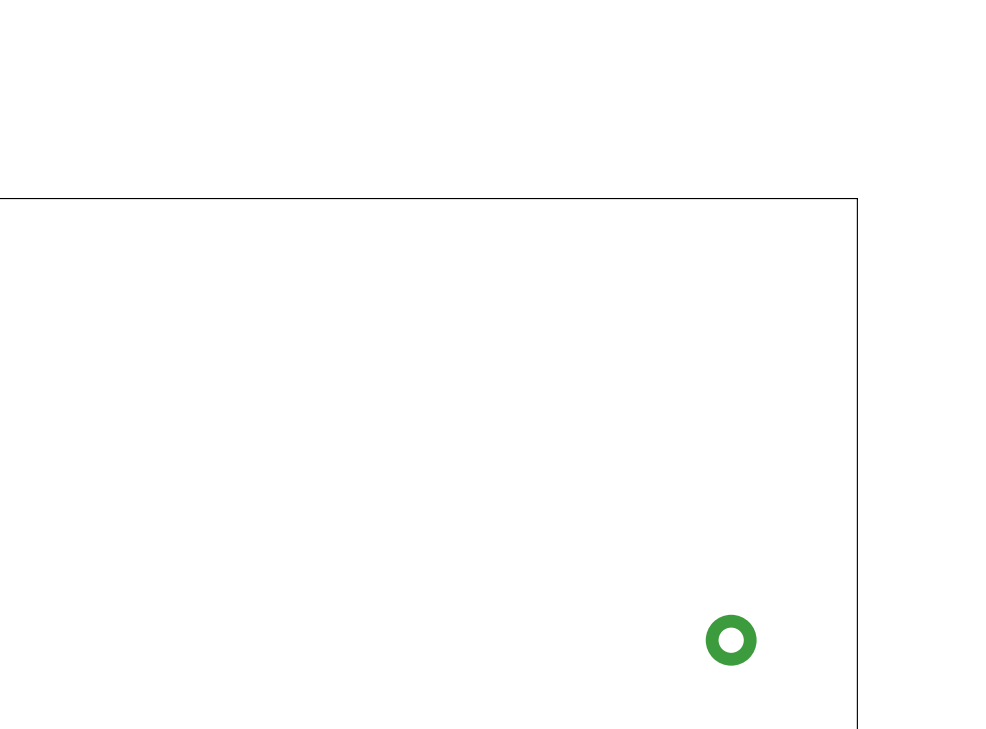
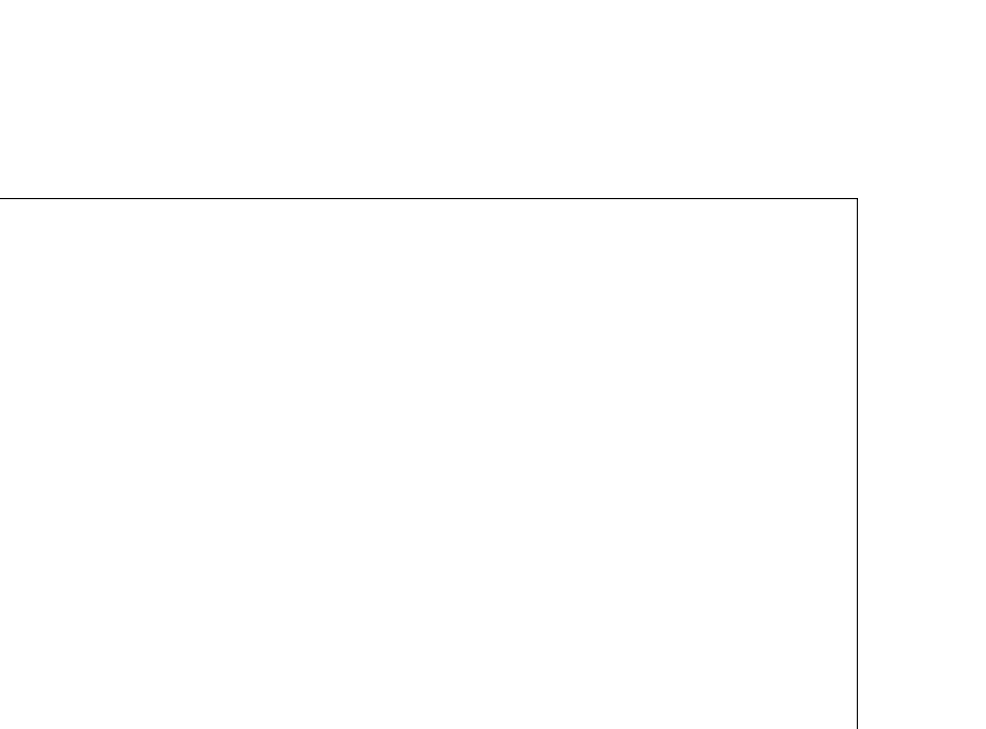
via: (731, 640) -> none

